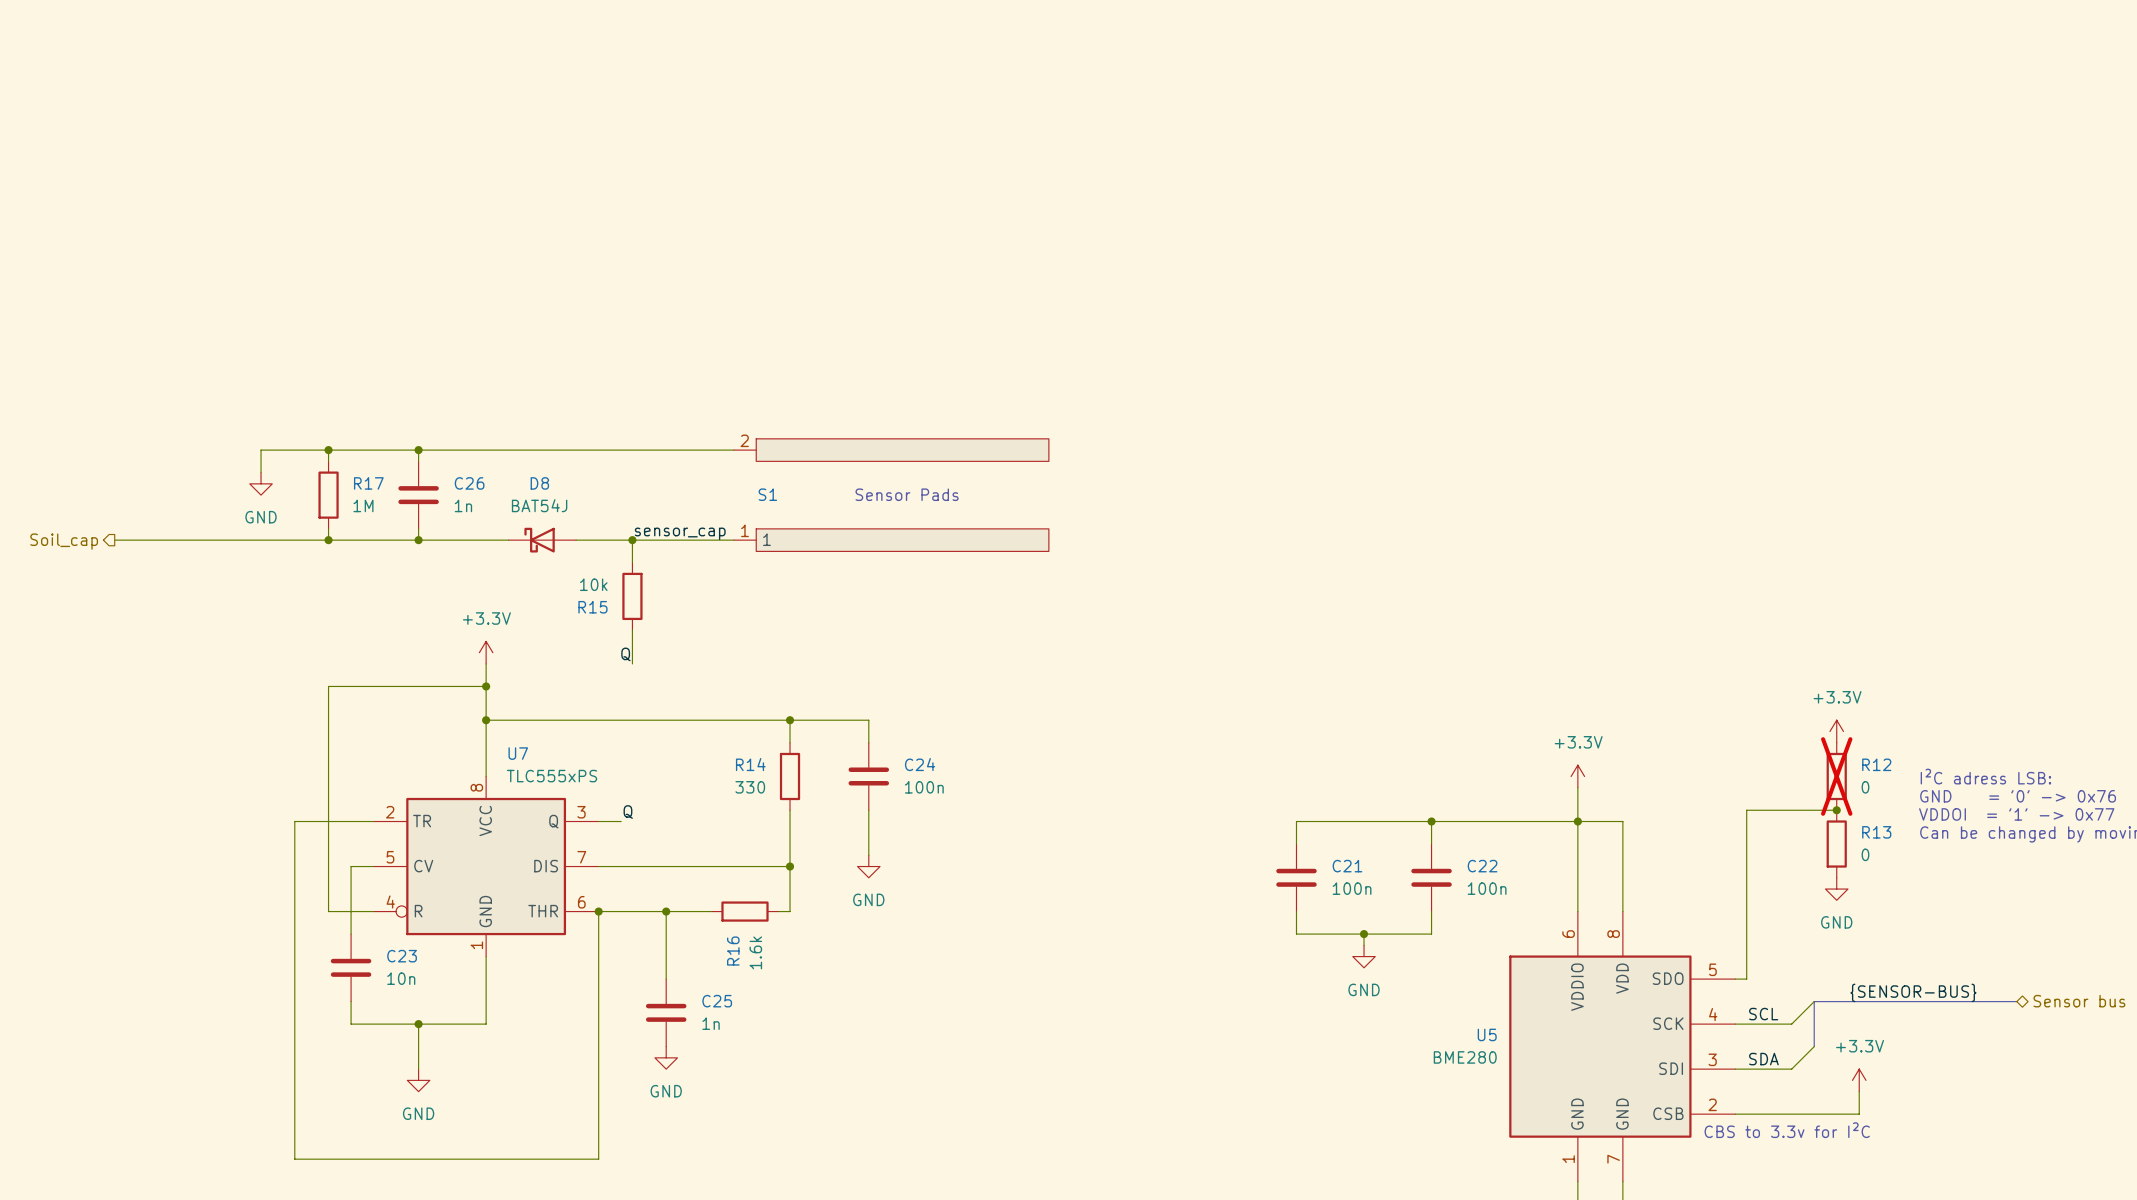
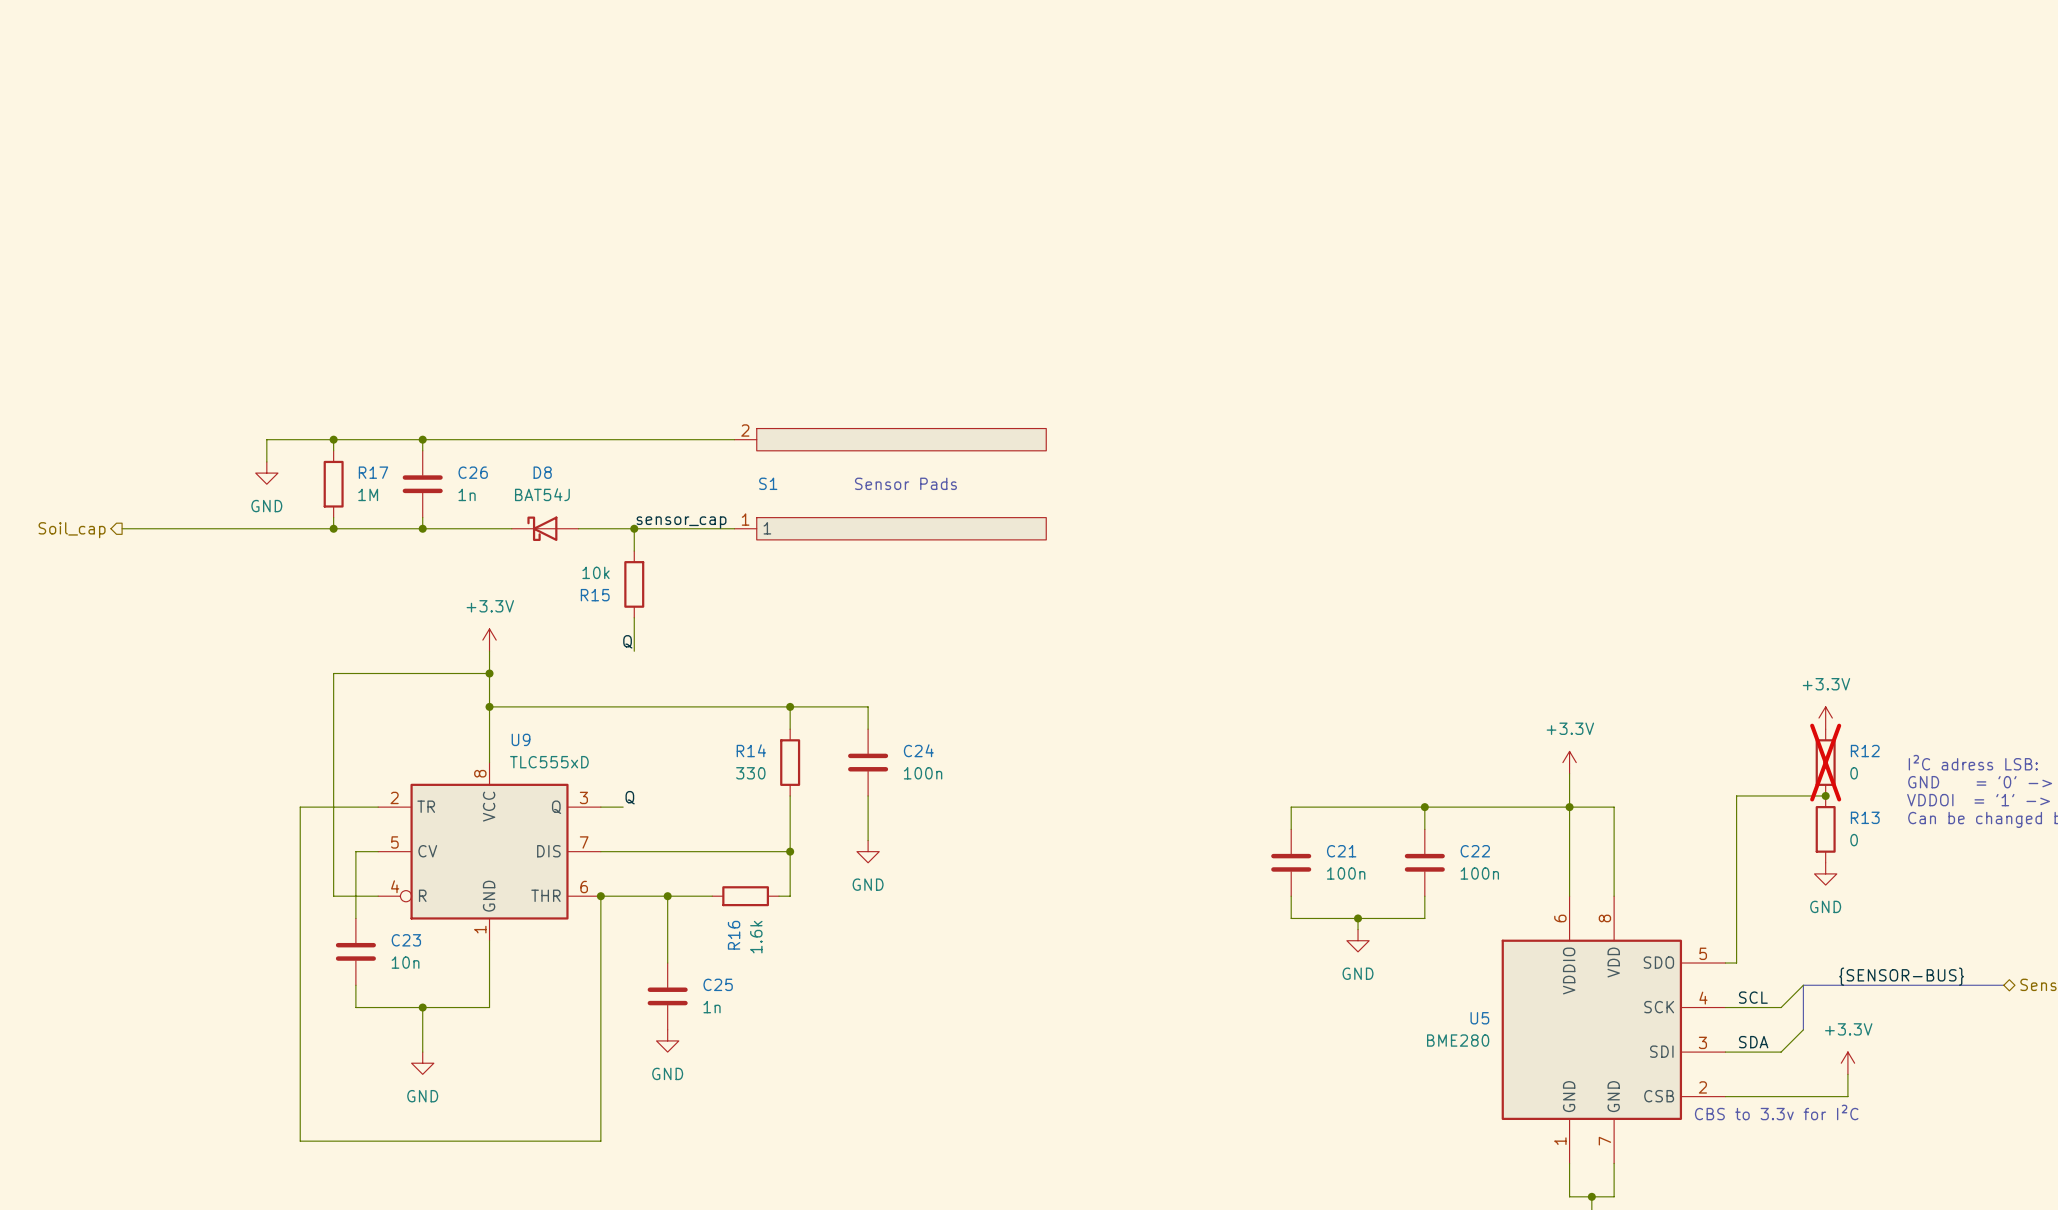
U7 name: U7 (518, 753) -> U9 (521, 739)
U7 value: TLC555xPS (552, 776) -> TLC555xD (549, 762)

